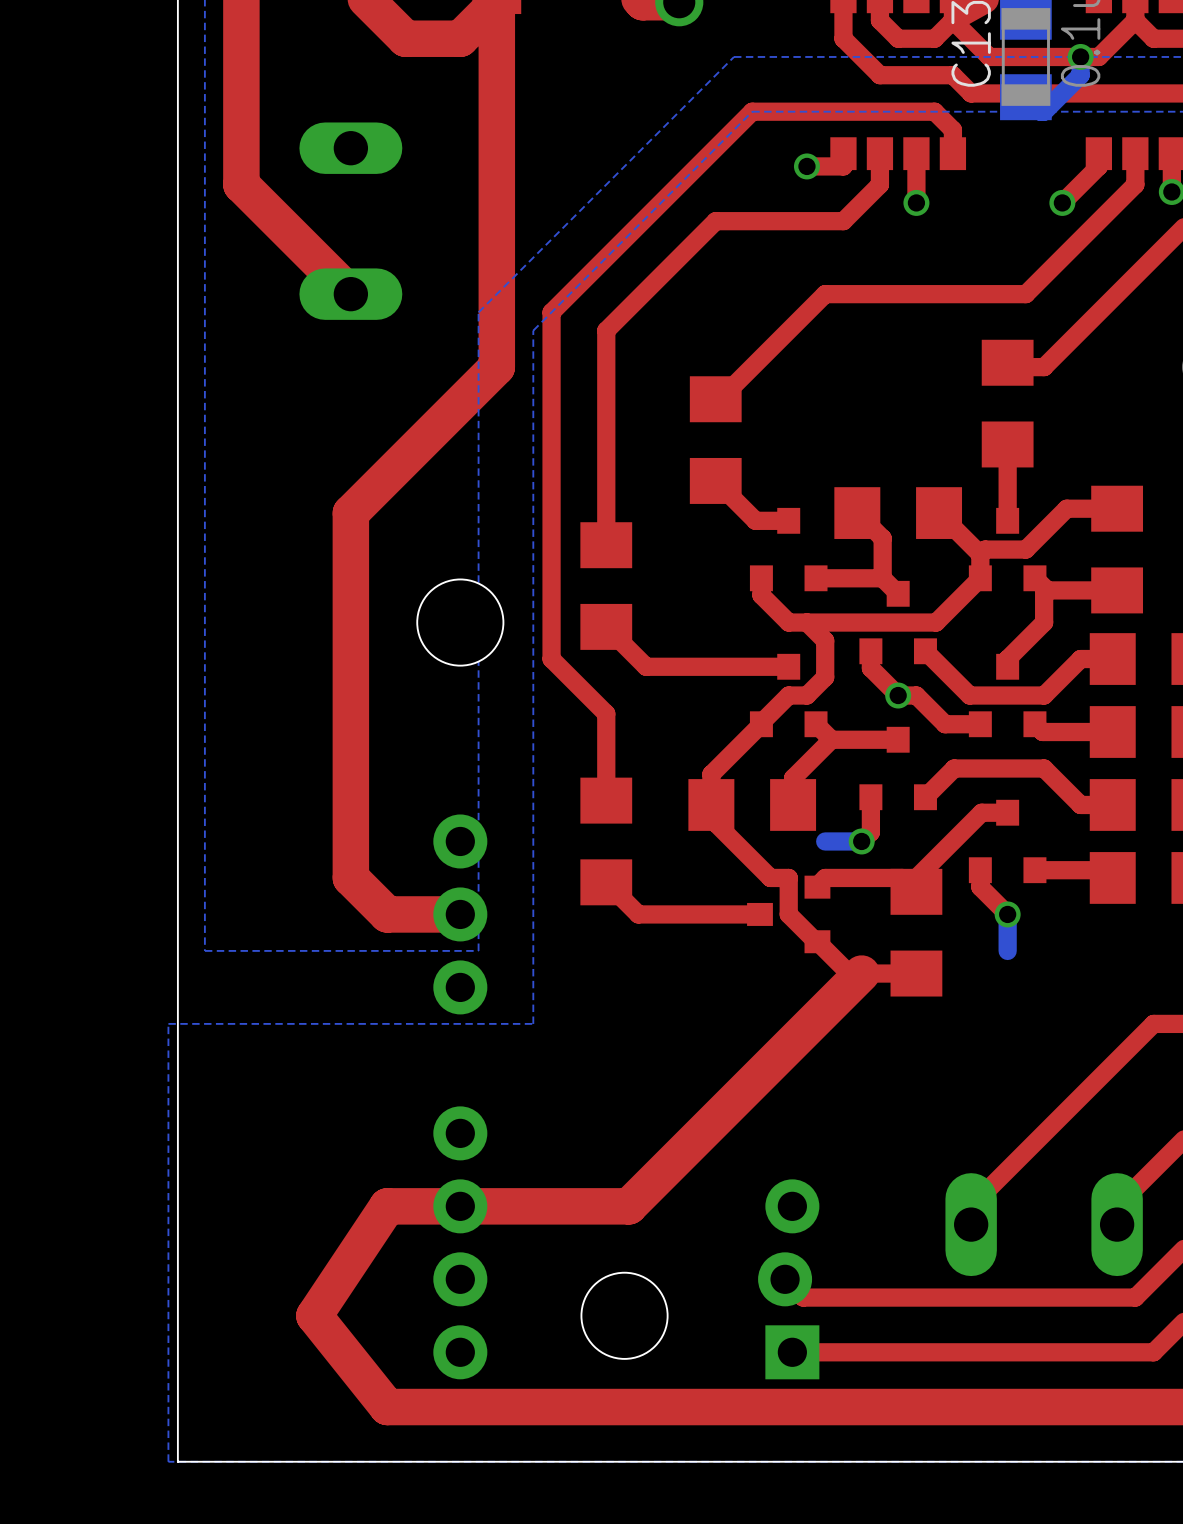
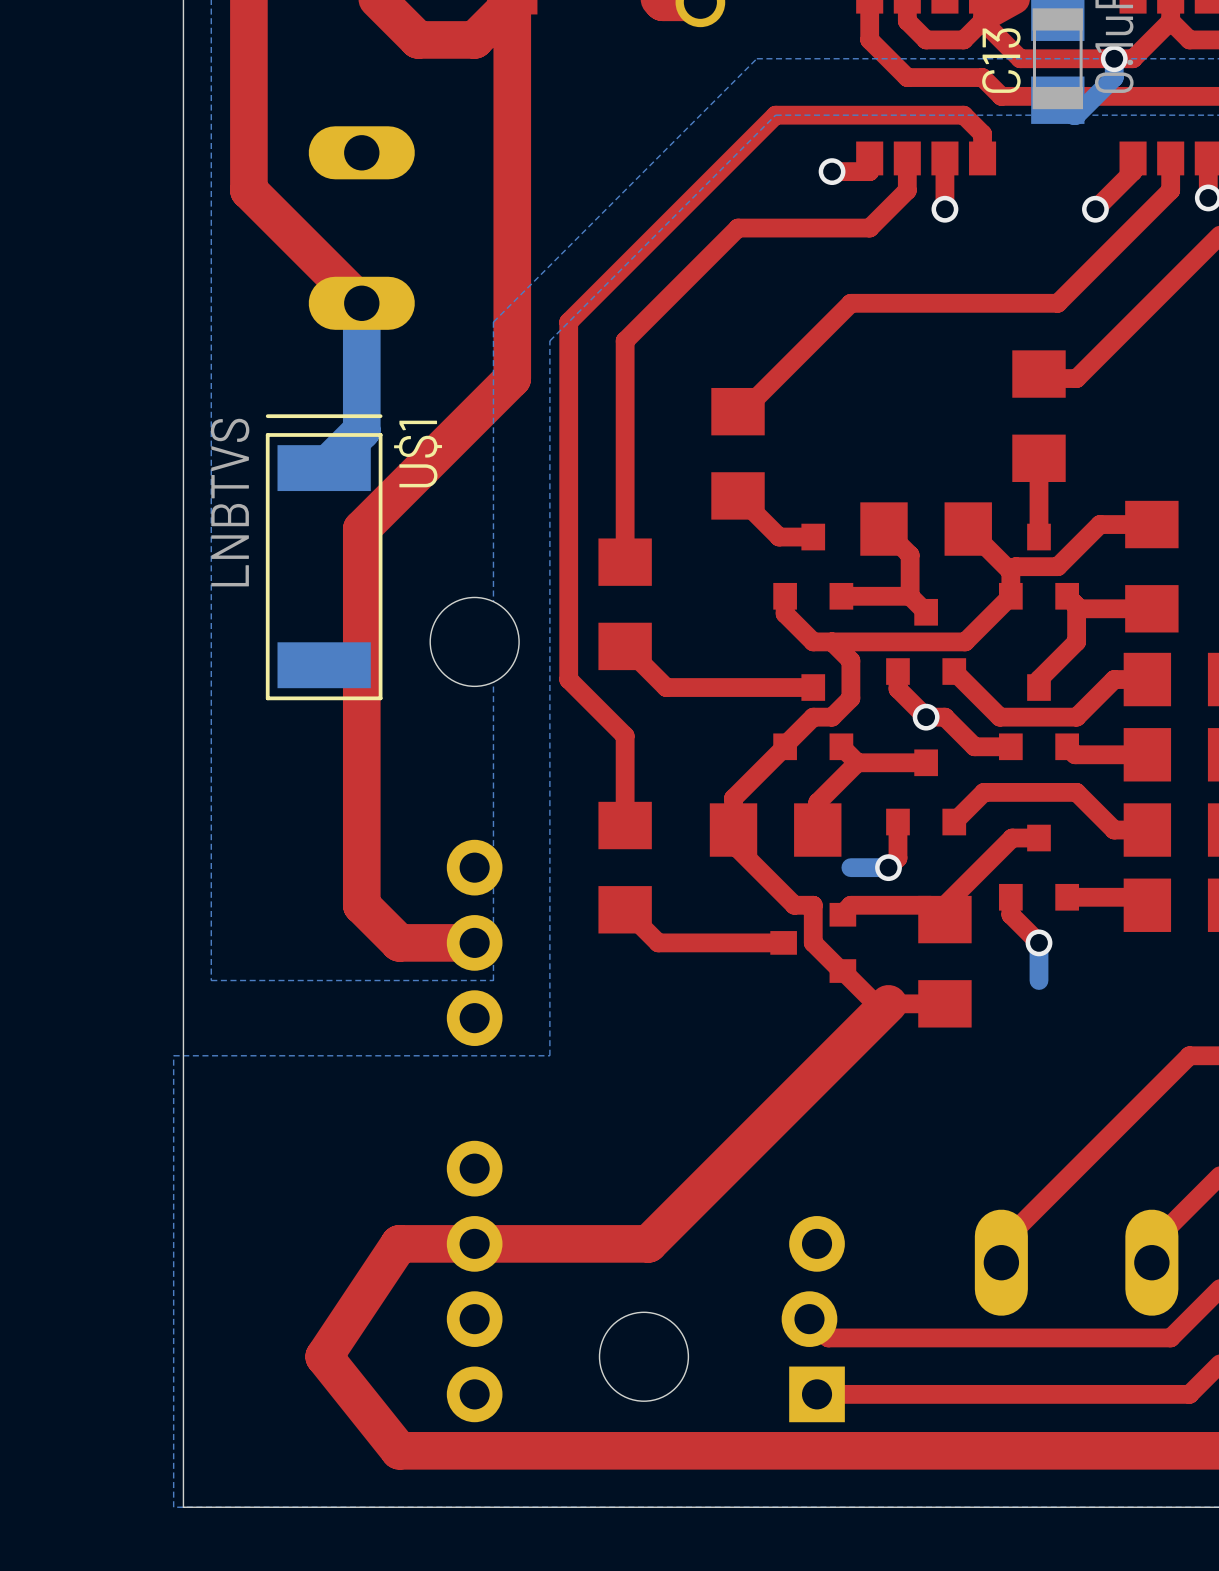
bottom track: none -> (361, 303) (361, 430) (324, 468)
U$1: none -> LNBTVS (324, 557)

